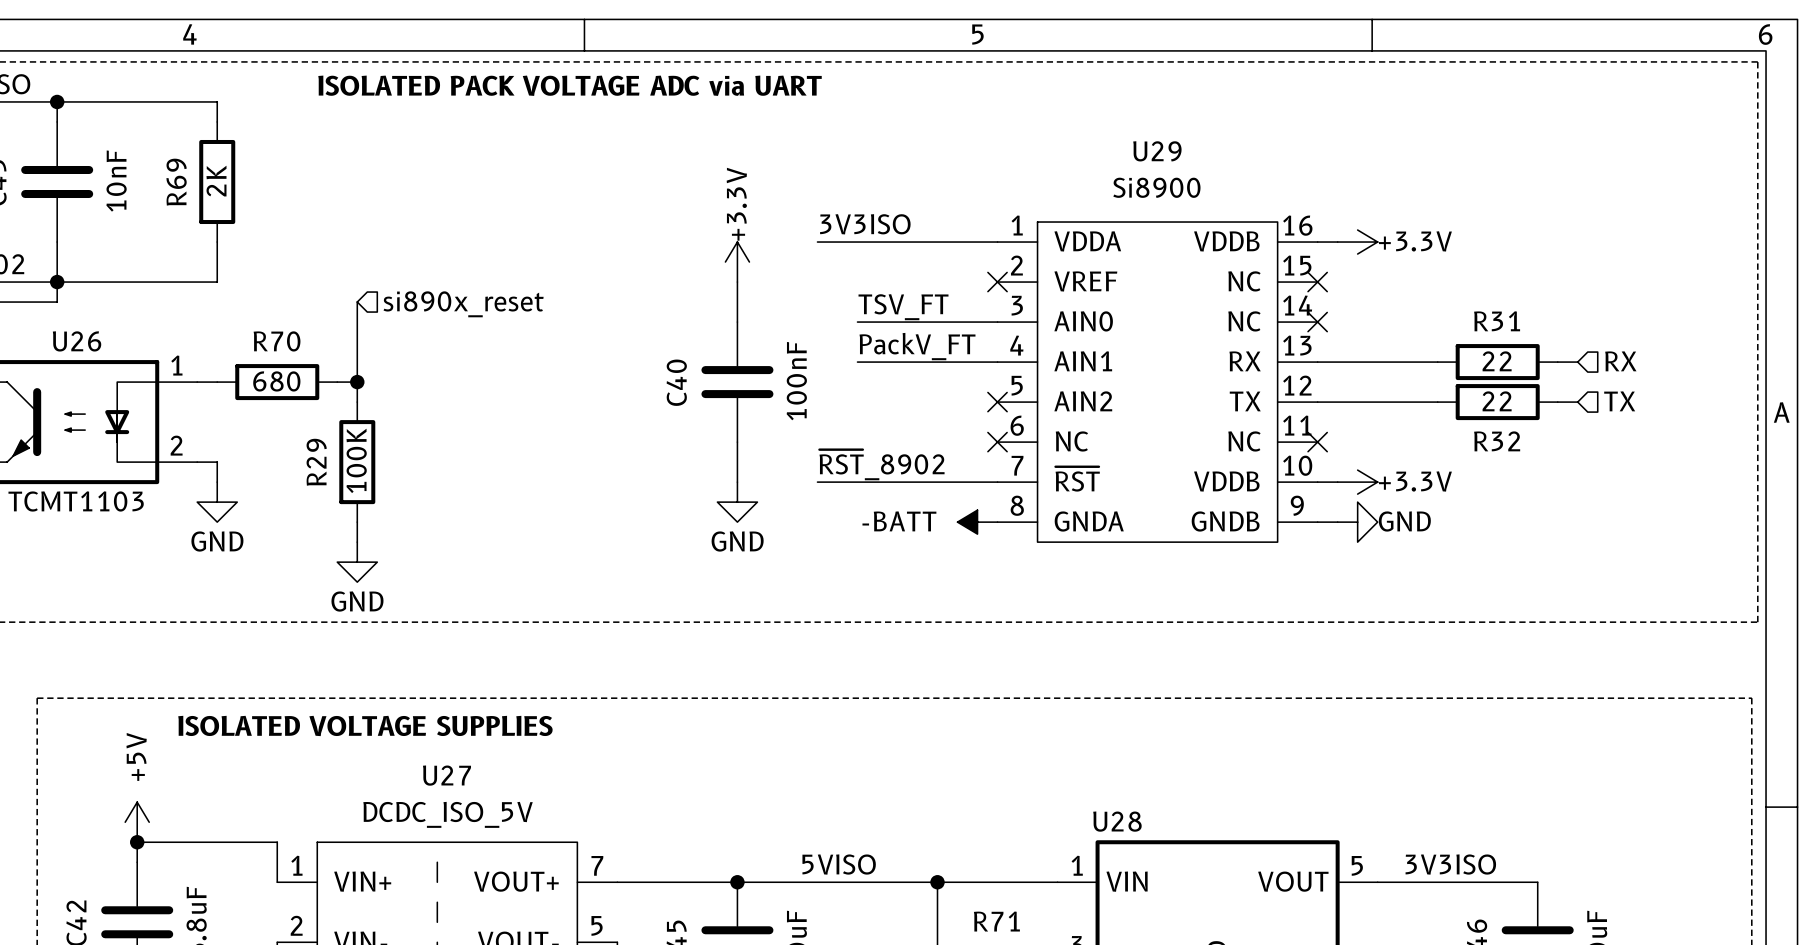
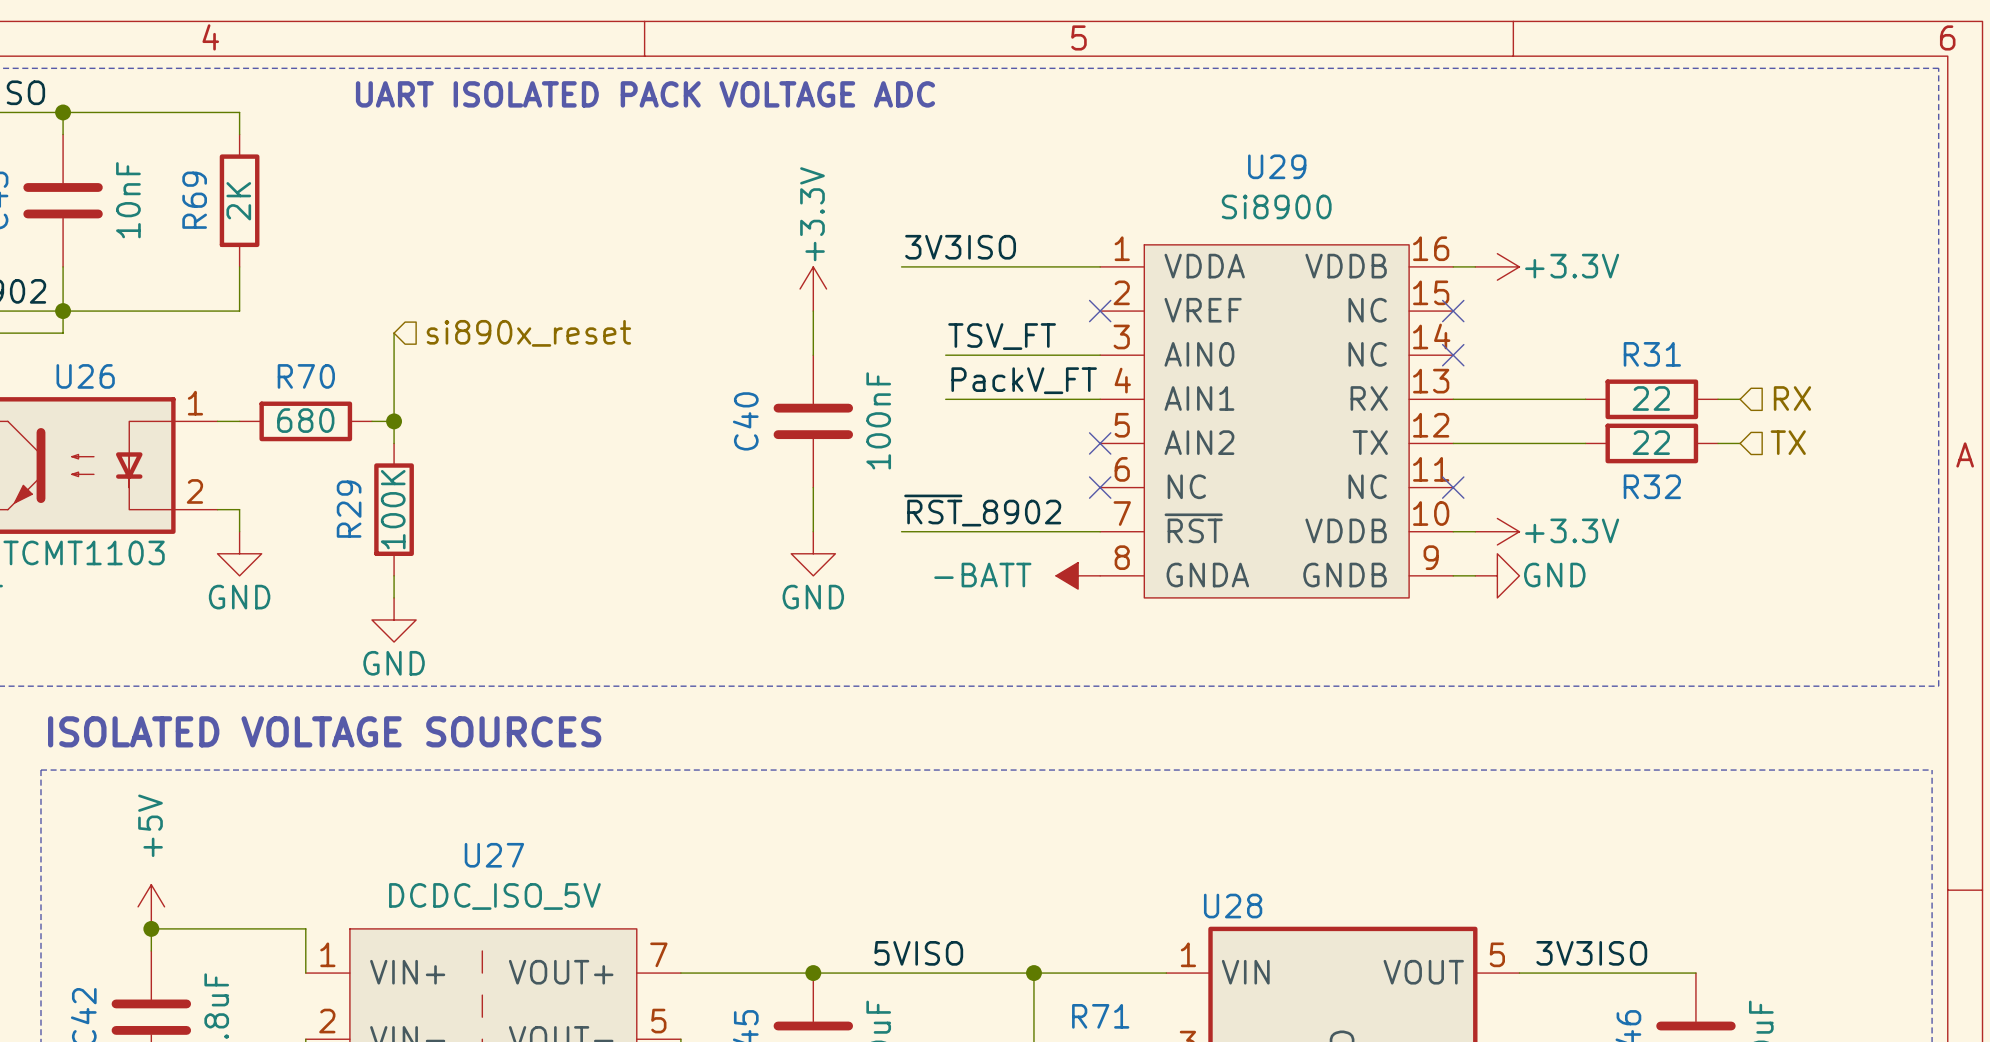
text: ISOLATED PACK VOLTAGE ADC via UART (570, 85) -> UART ISOLATED PACK VOLTAGE ADC (645, 94)
text: none -> ISOLATED VOLTAGE SOURCES (324, 731)
text: ISOLATED VOLTAGE SUPPLIES (365, 725) -> none

